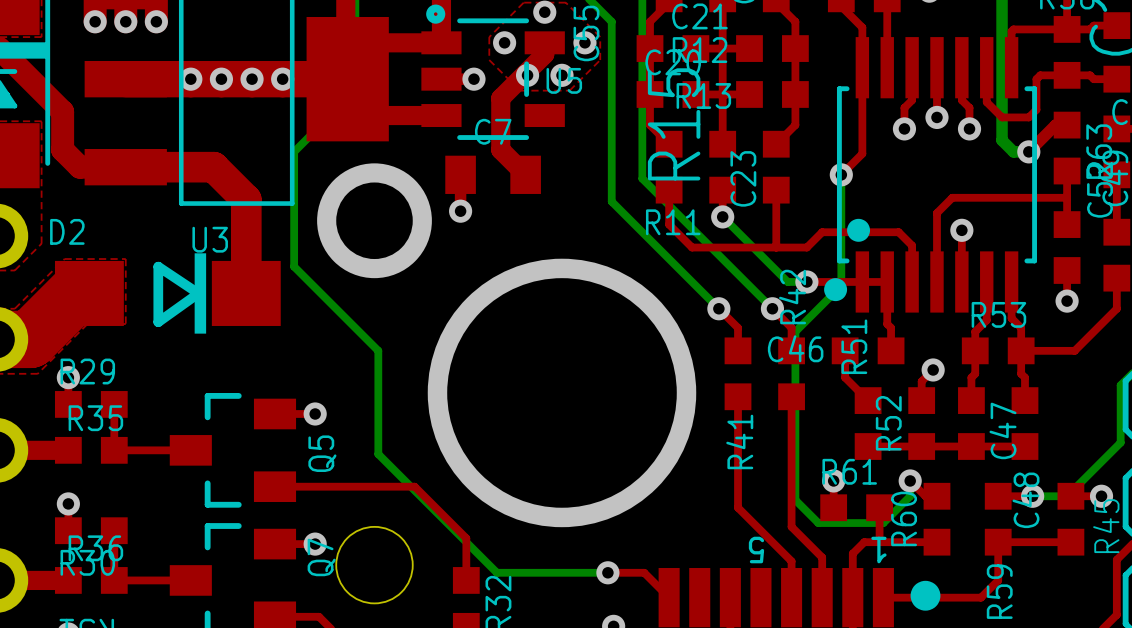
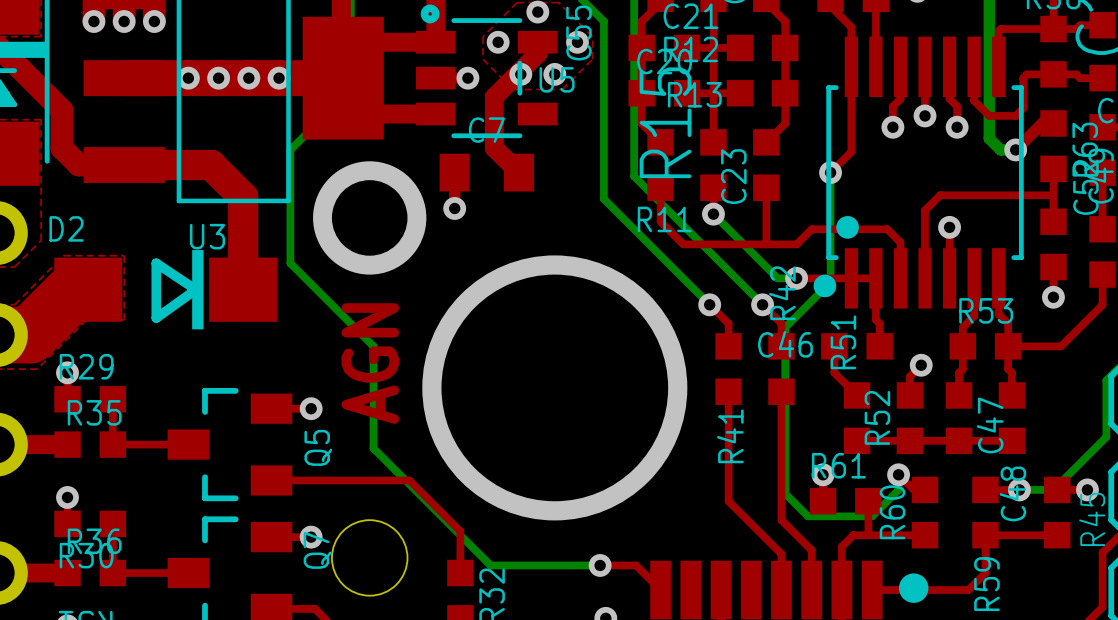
text: none -> AGN (370, 363)
text: 5 (756, 550) -> none
text: 1 (878, 550) -> none

